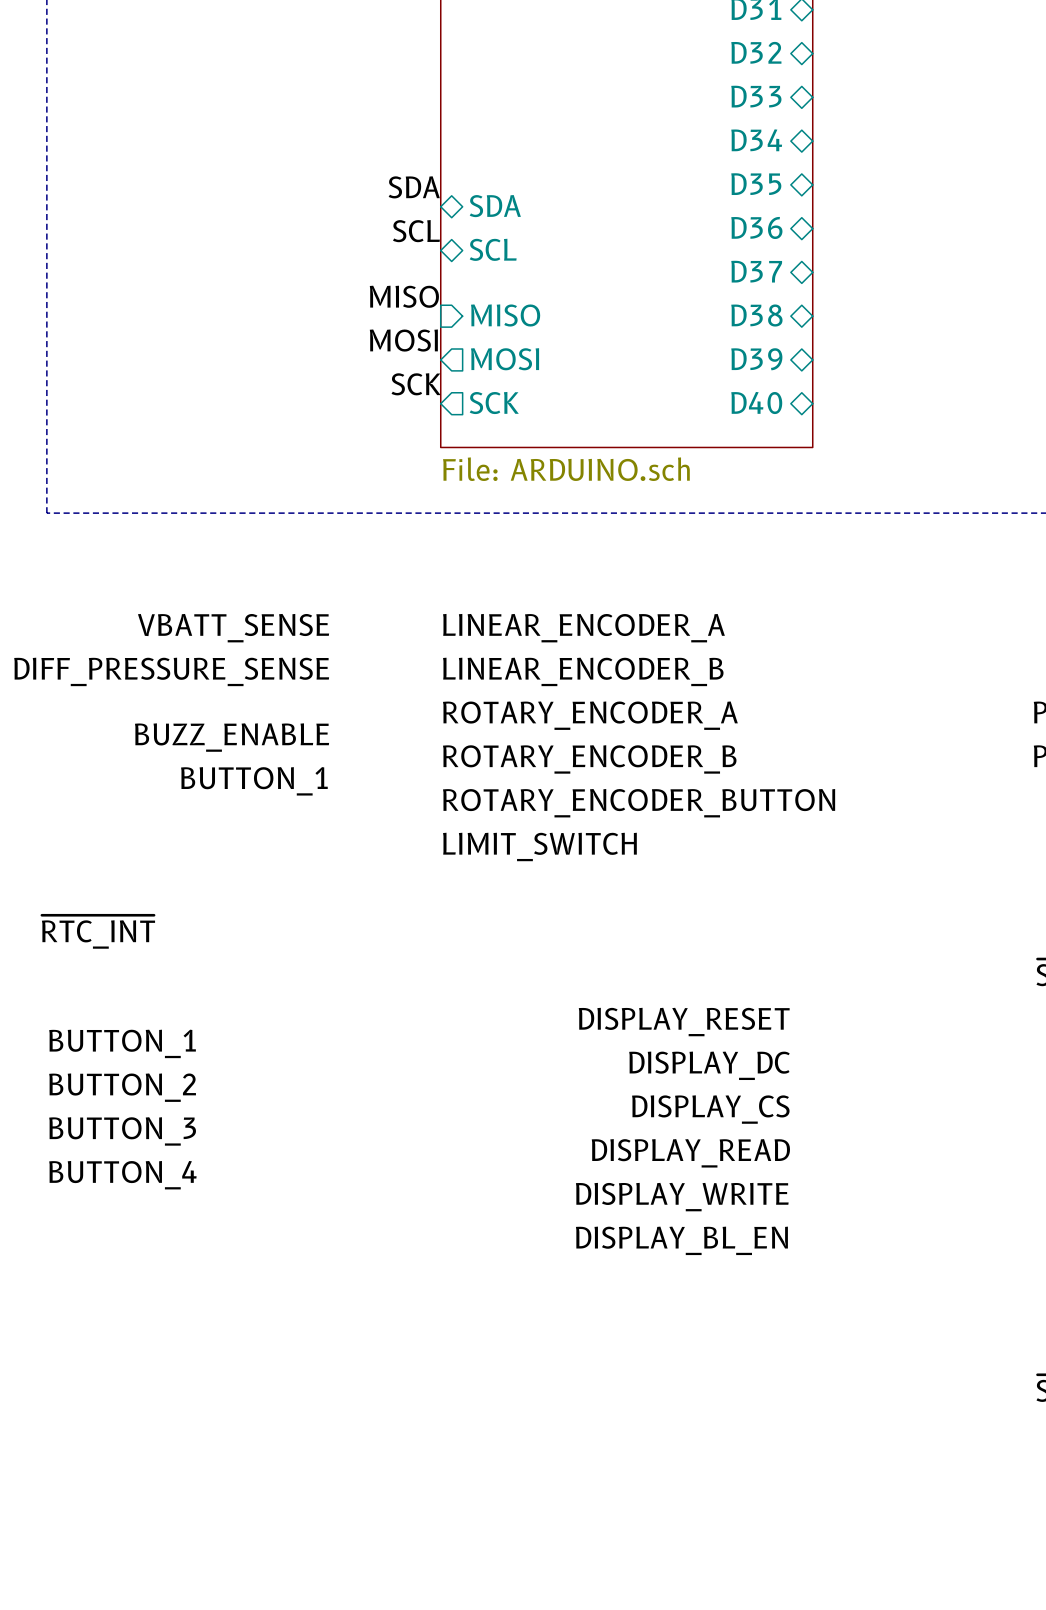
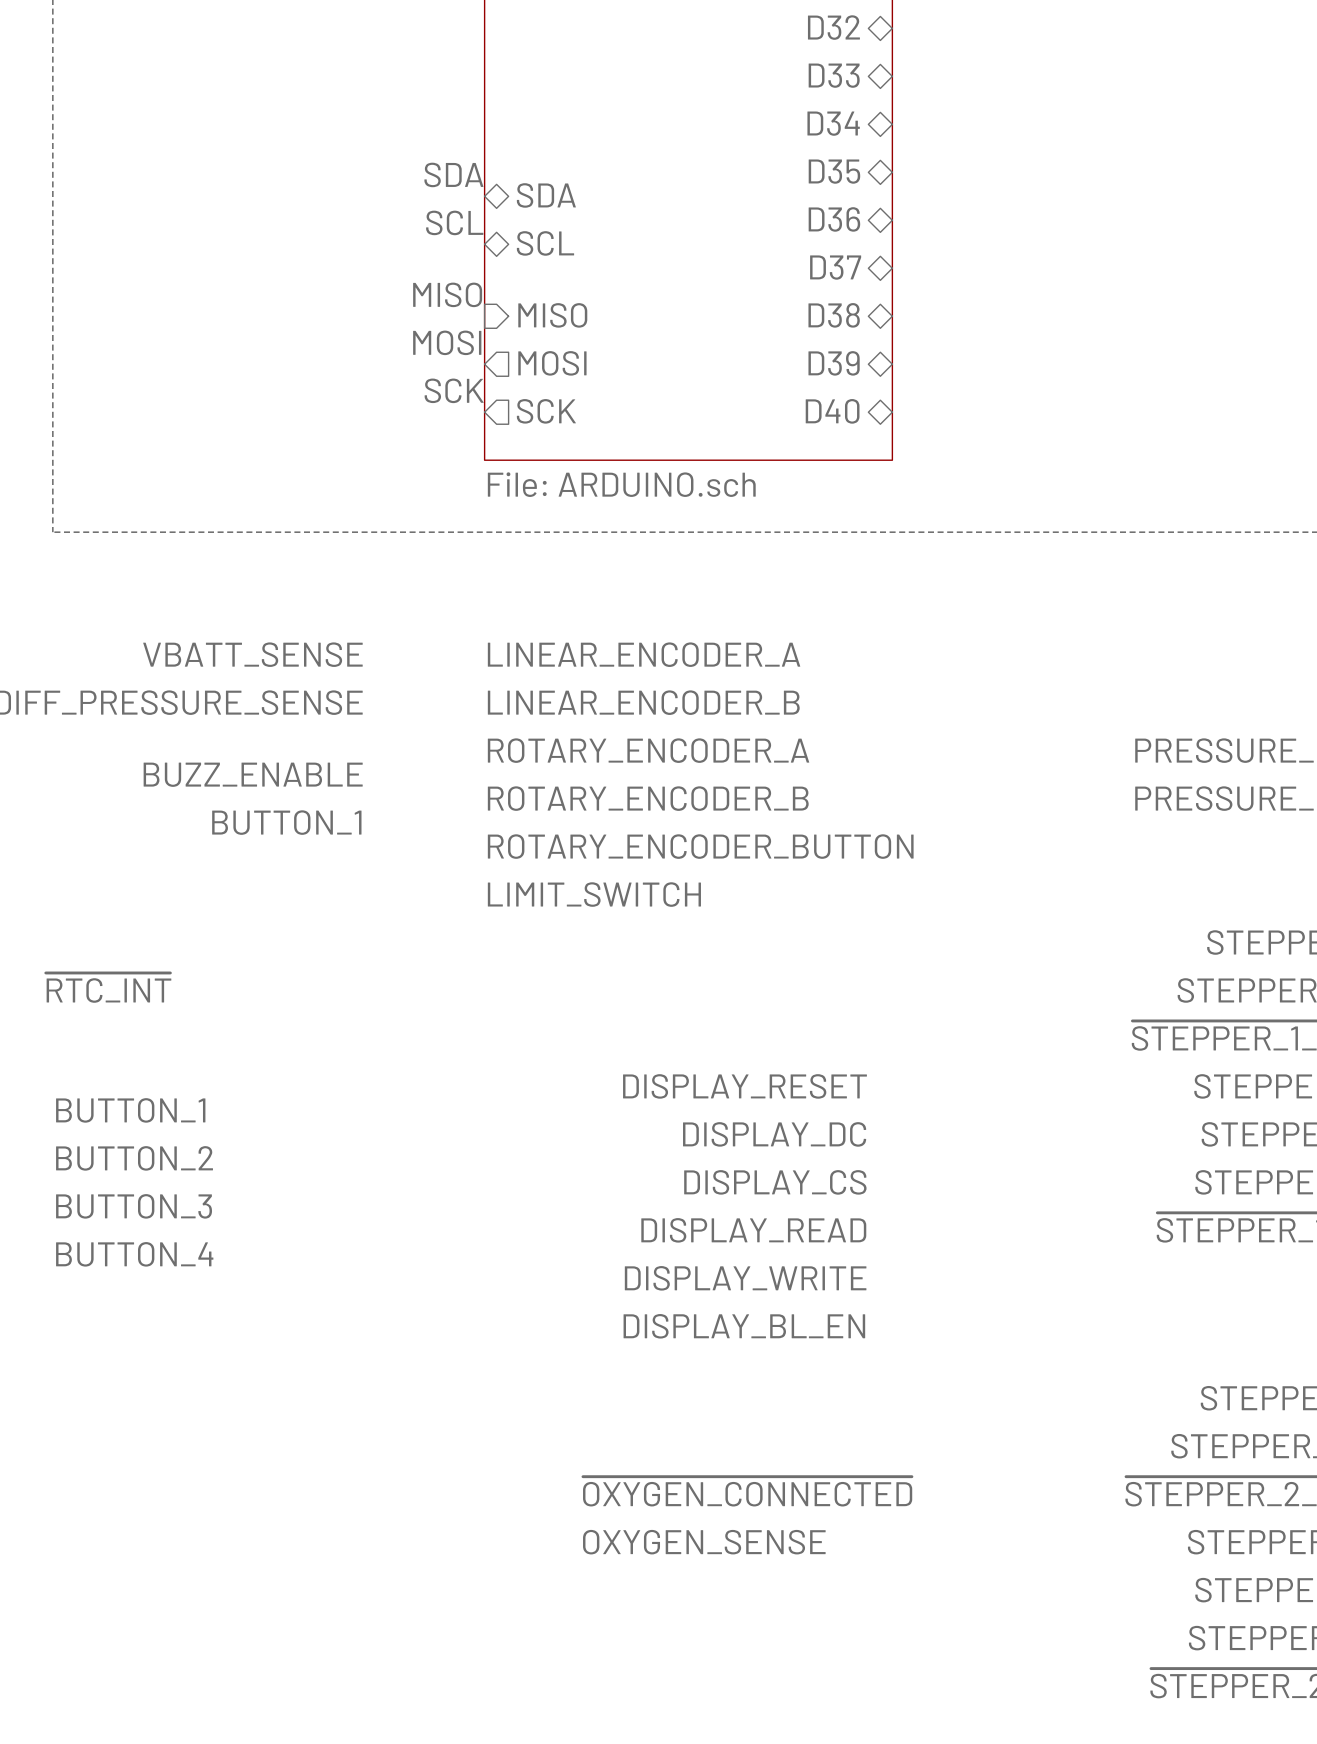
label: none -> ~{OXYGEN_CONNECTED} (747, 1491)
label: none -> OXYGEN_SENSE (704, 1542)

